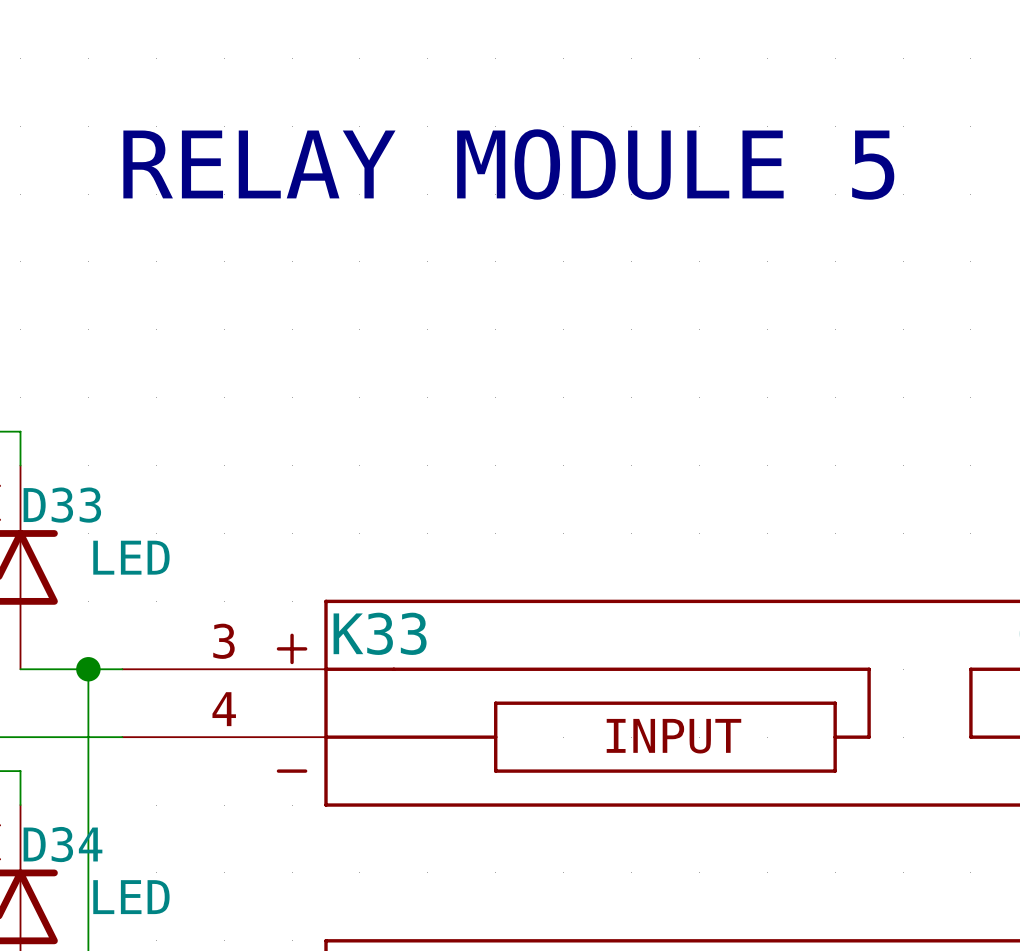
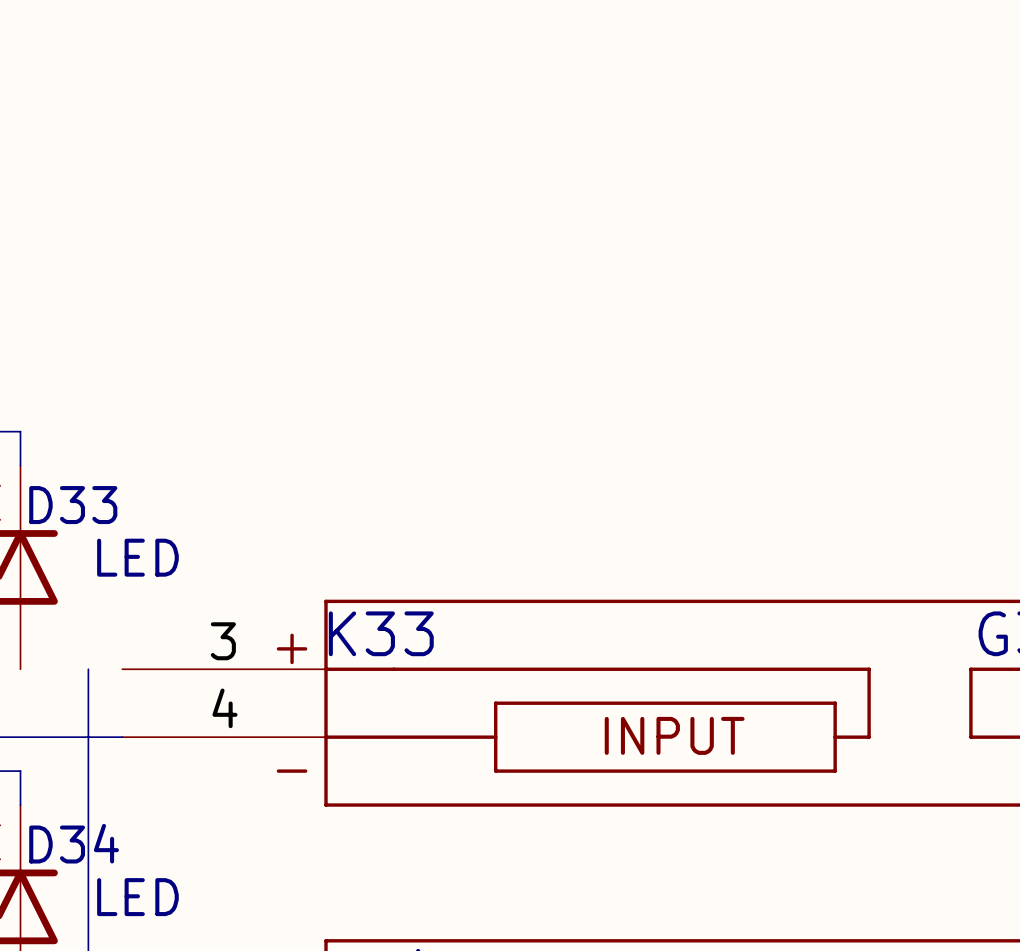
text: RELAY MODULE 5 (508, 164) -> none
wire: (20, 669) (122, 669) -> none
junction: (88, 669) -> none

